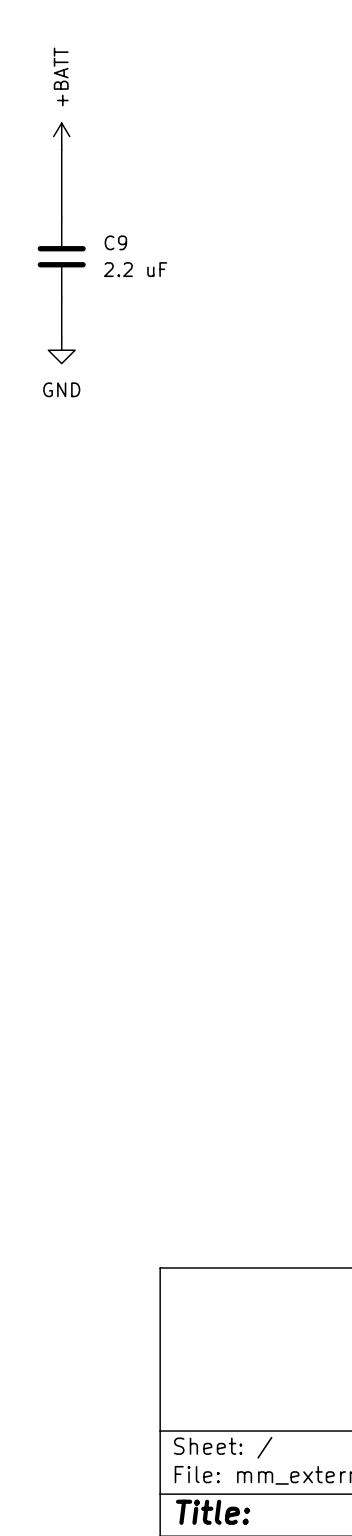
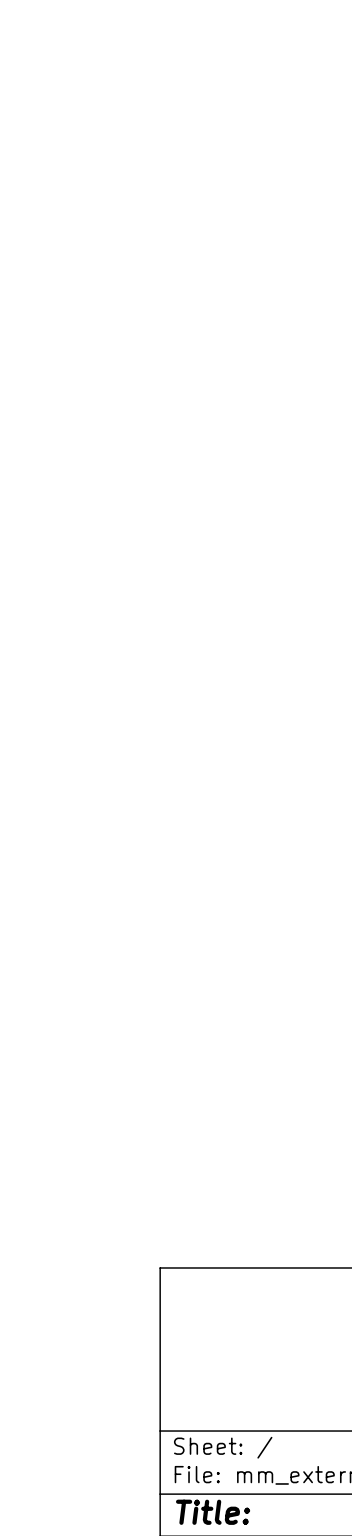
power symbol: +BATT (61, 136) -> none
wire: (61, 149) (61, 216) -> none
C9: 2.2 uF (61, 256) -> none
wire: (61, 296) (61, 336) -> none
power symbol: GND (61, 350) -> none

